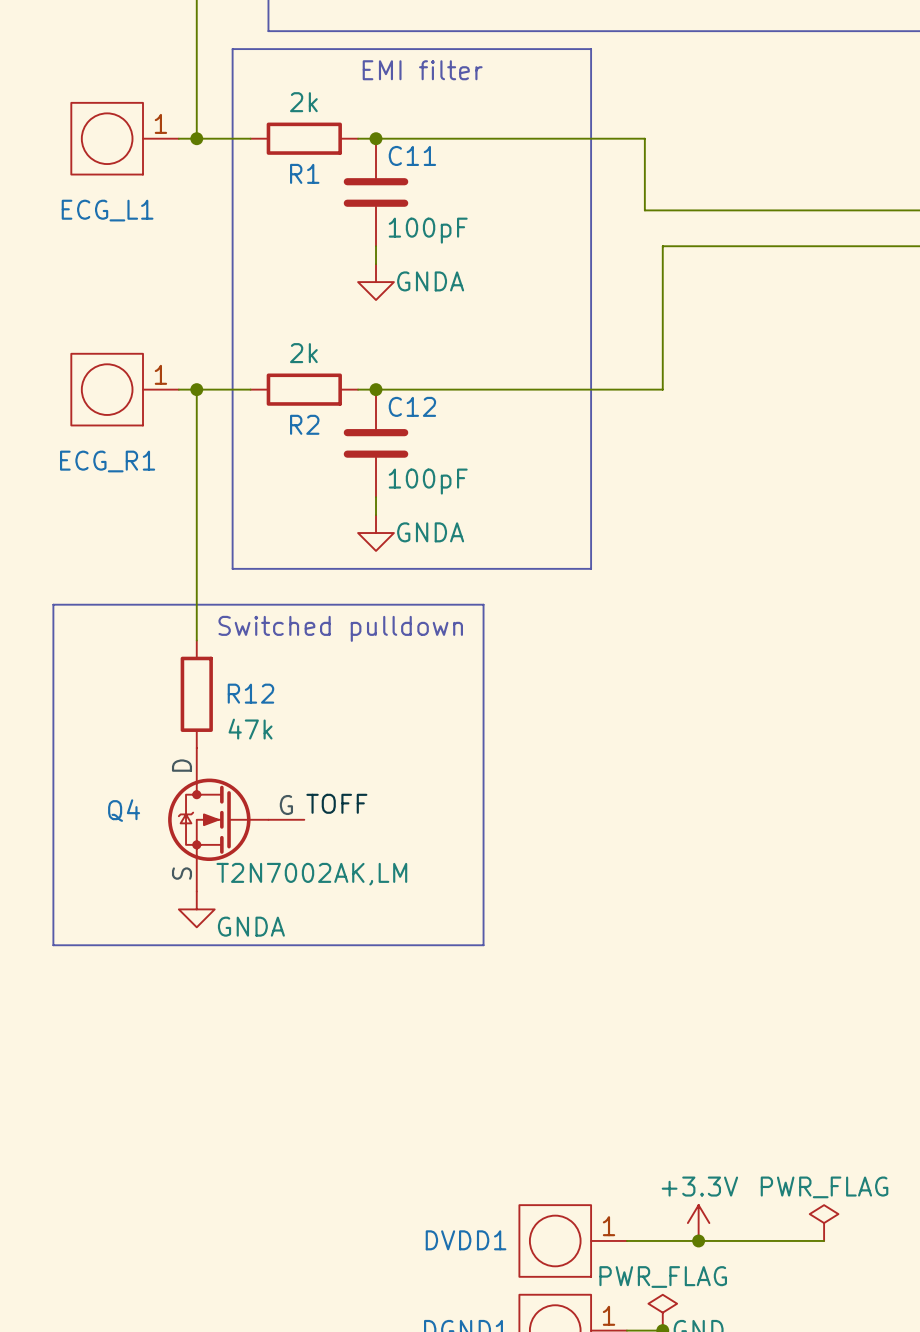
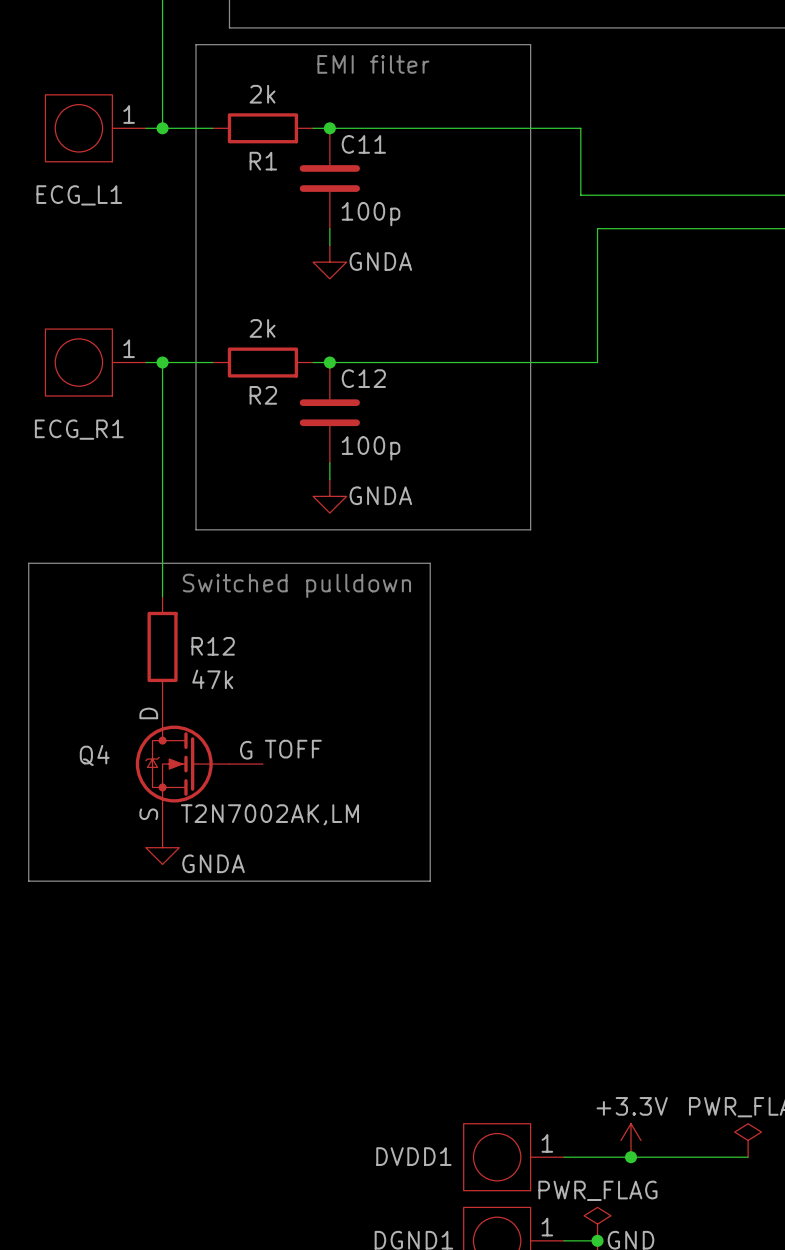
C11 value: 100pF (428, 230) -> 100p (371, 214)
C12 value: 100pF (428, 481) -> 100p (371, 448)

